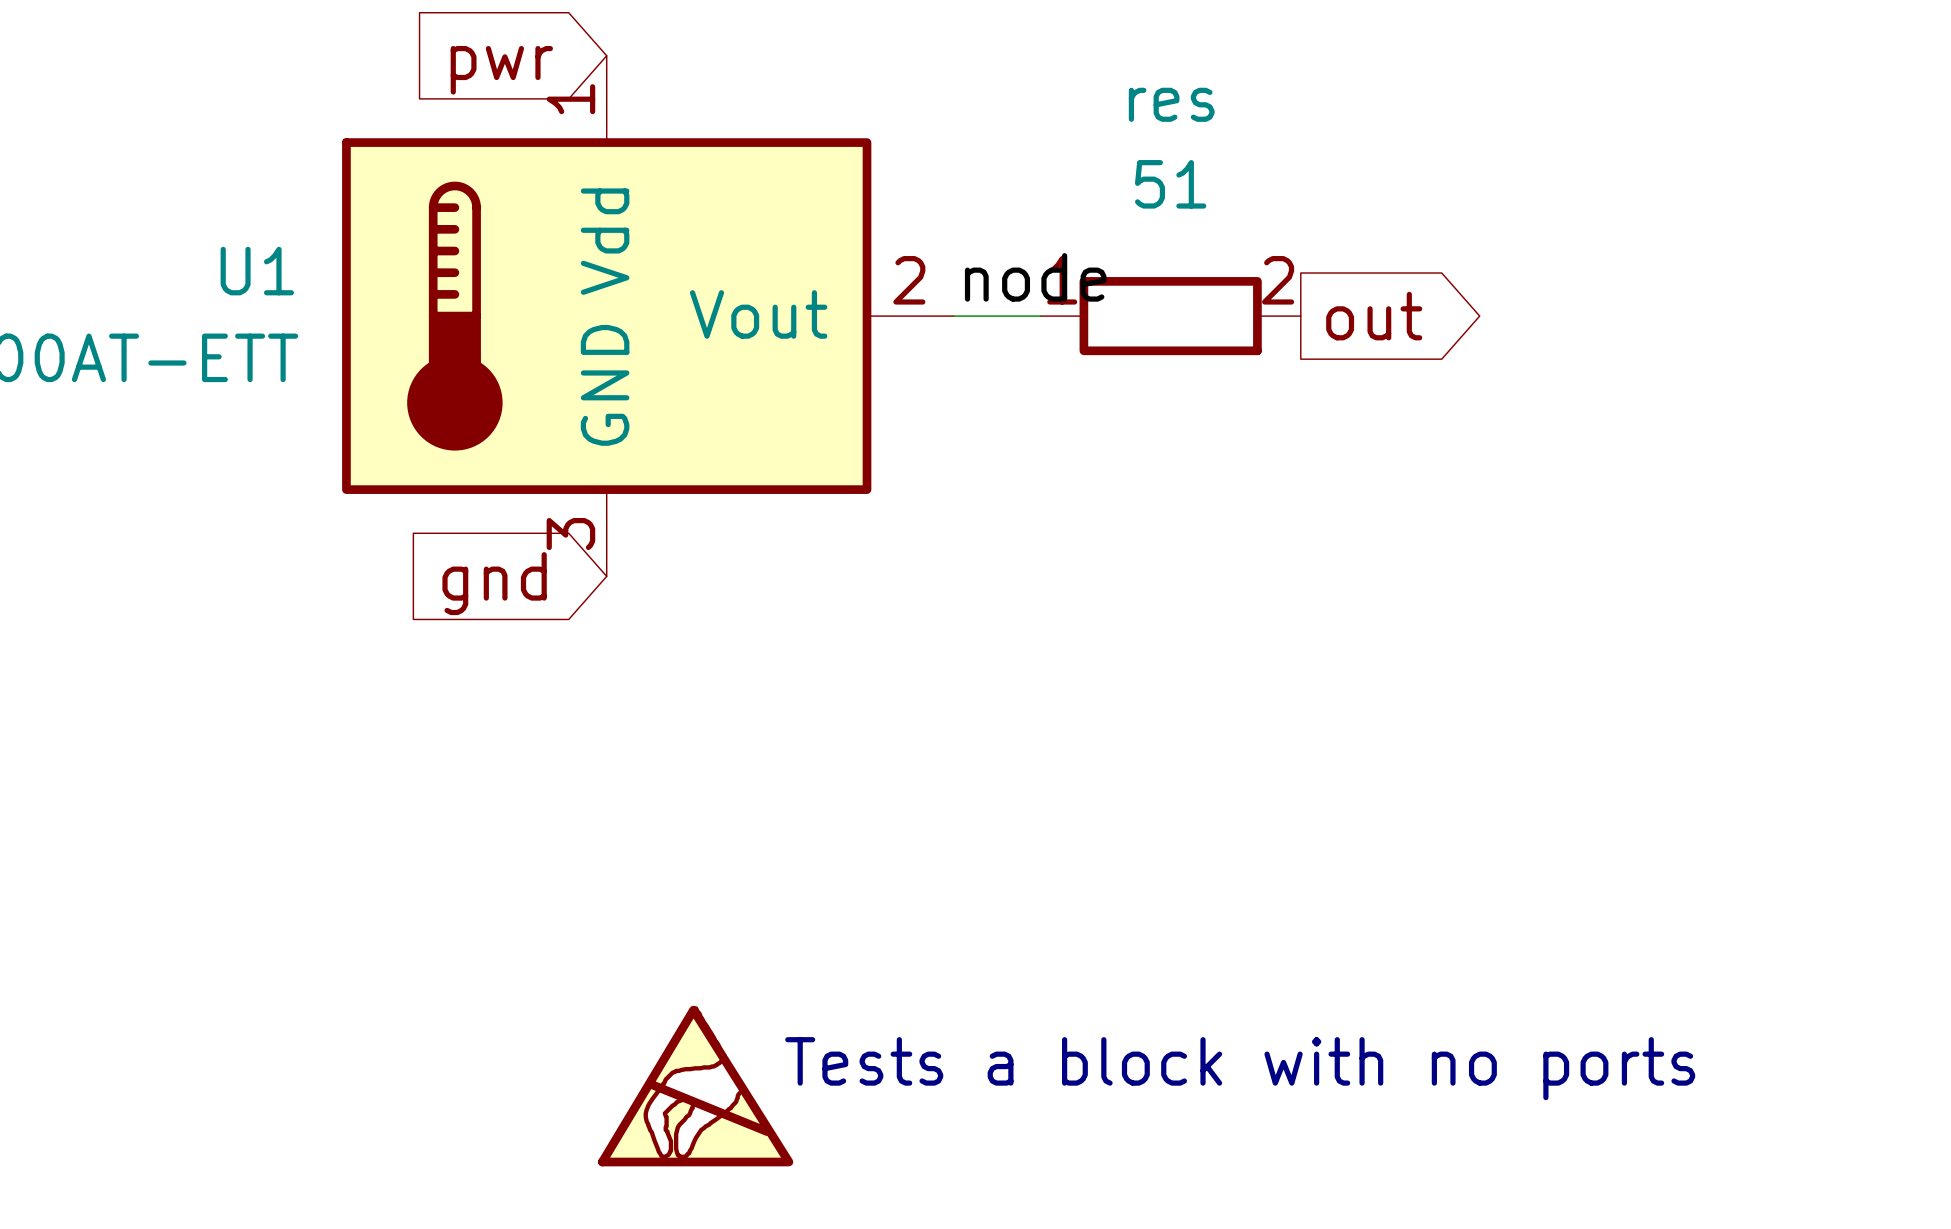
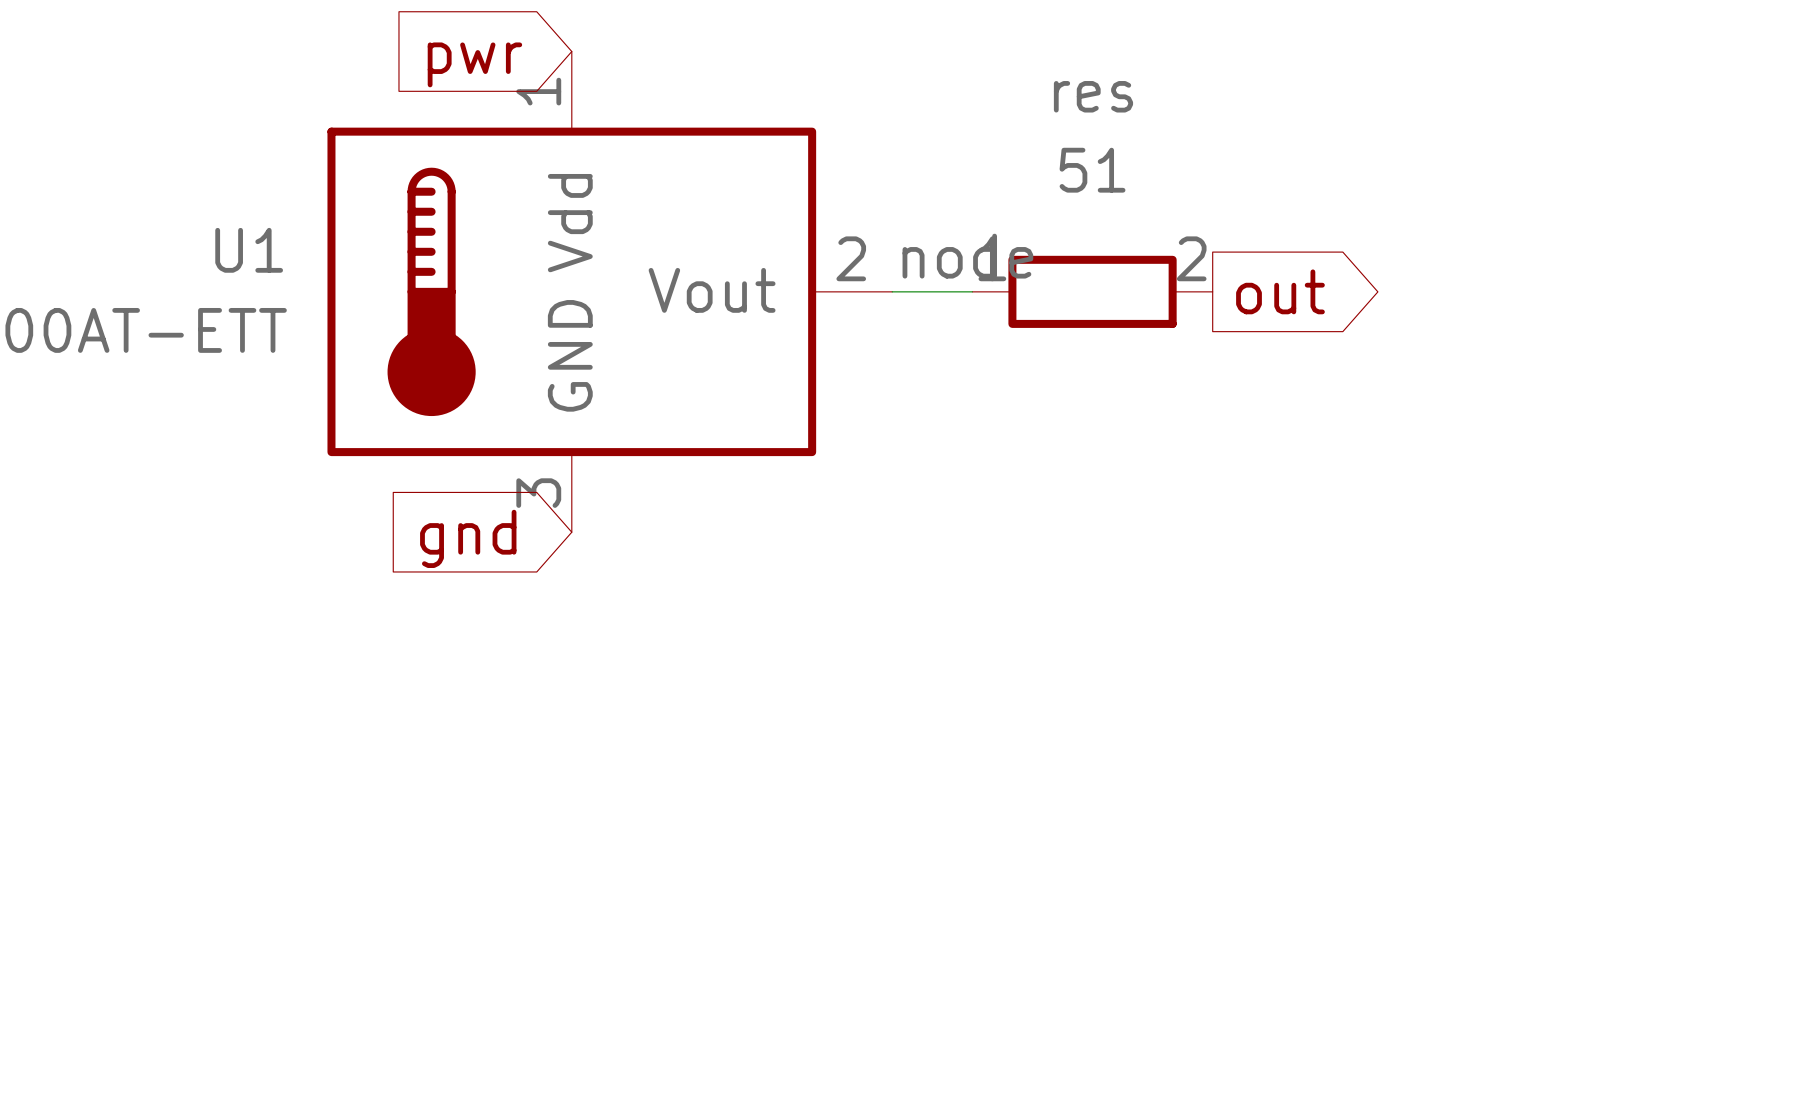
text: Tests a block with no ports (1240, 1068) -> none
part: (695, 1086) -> none

